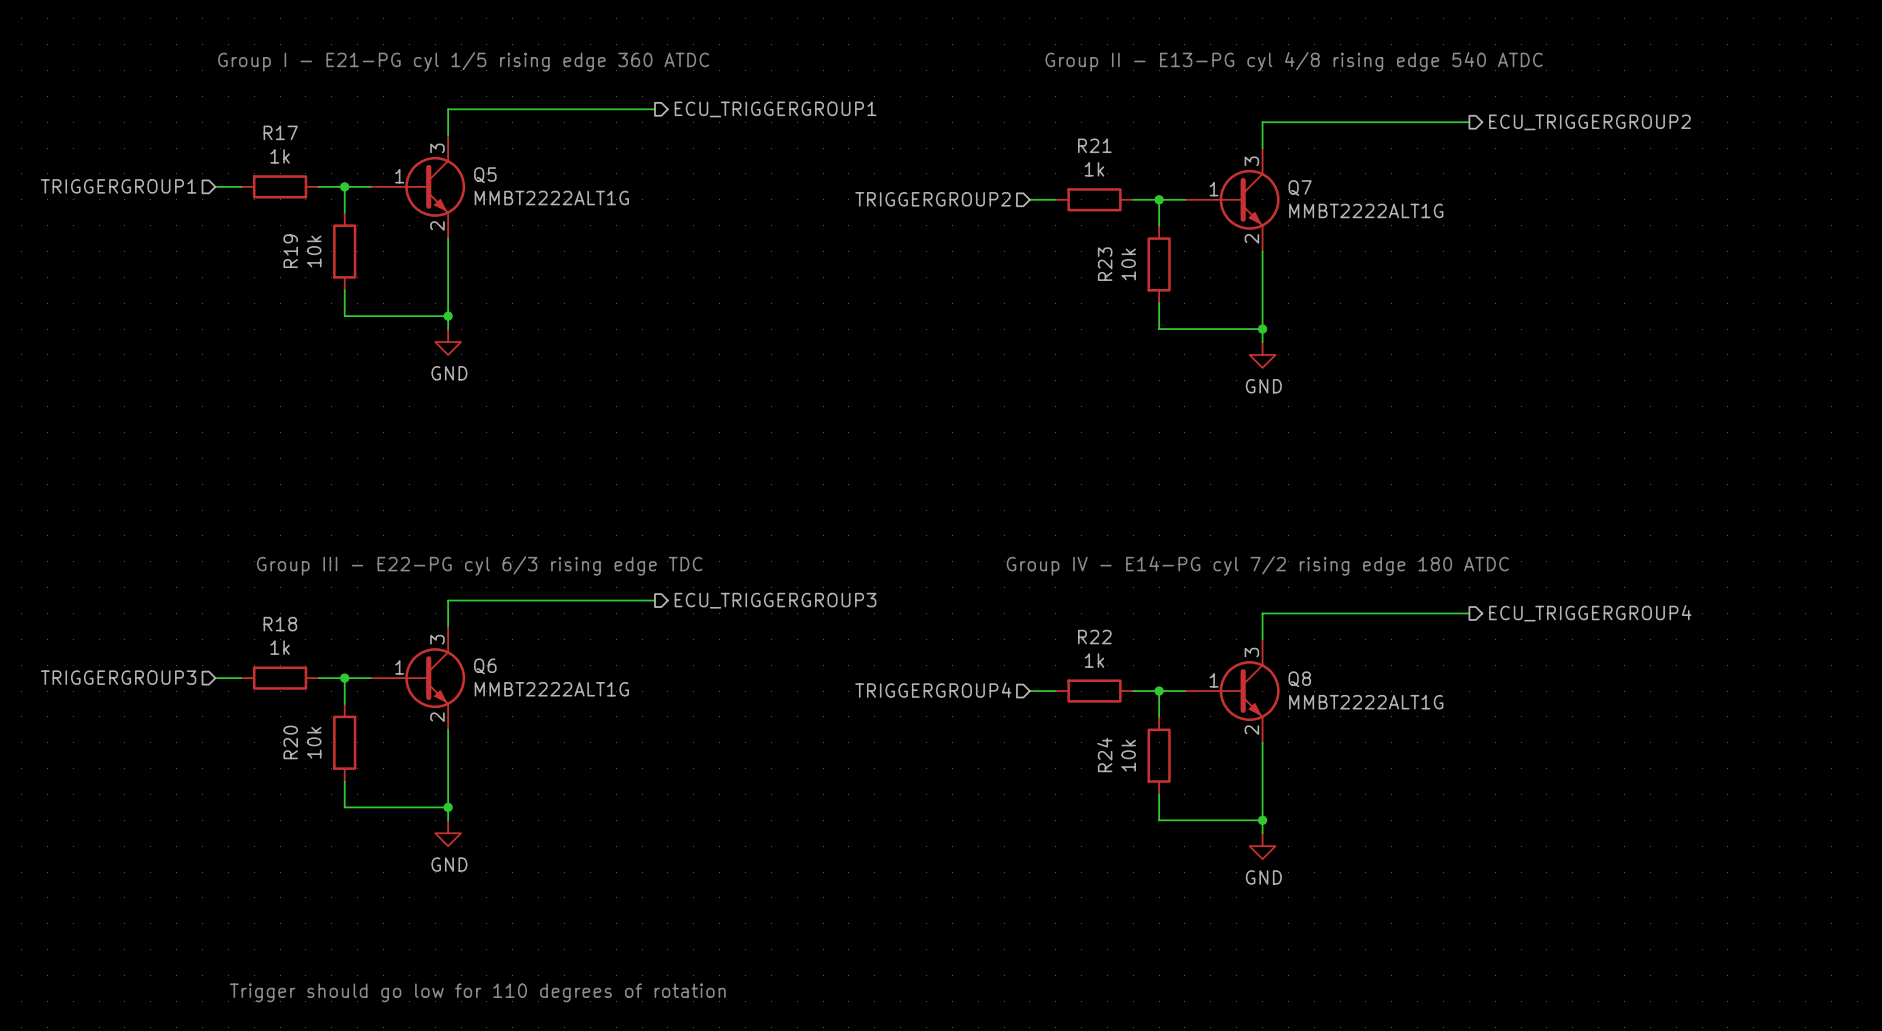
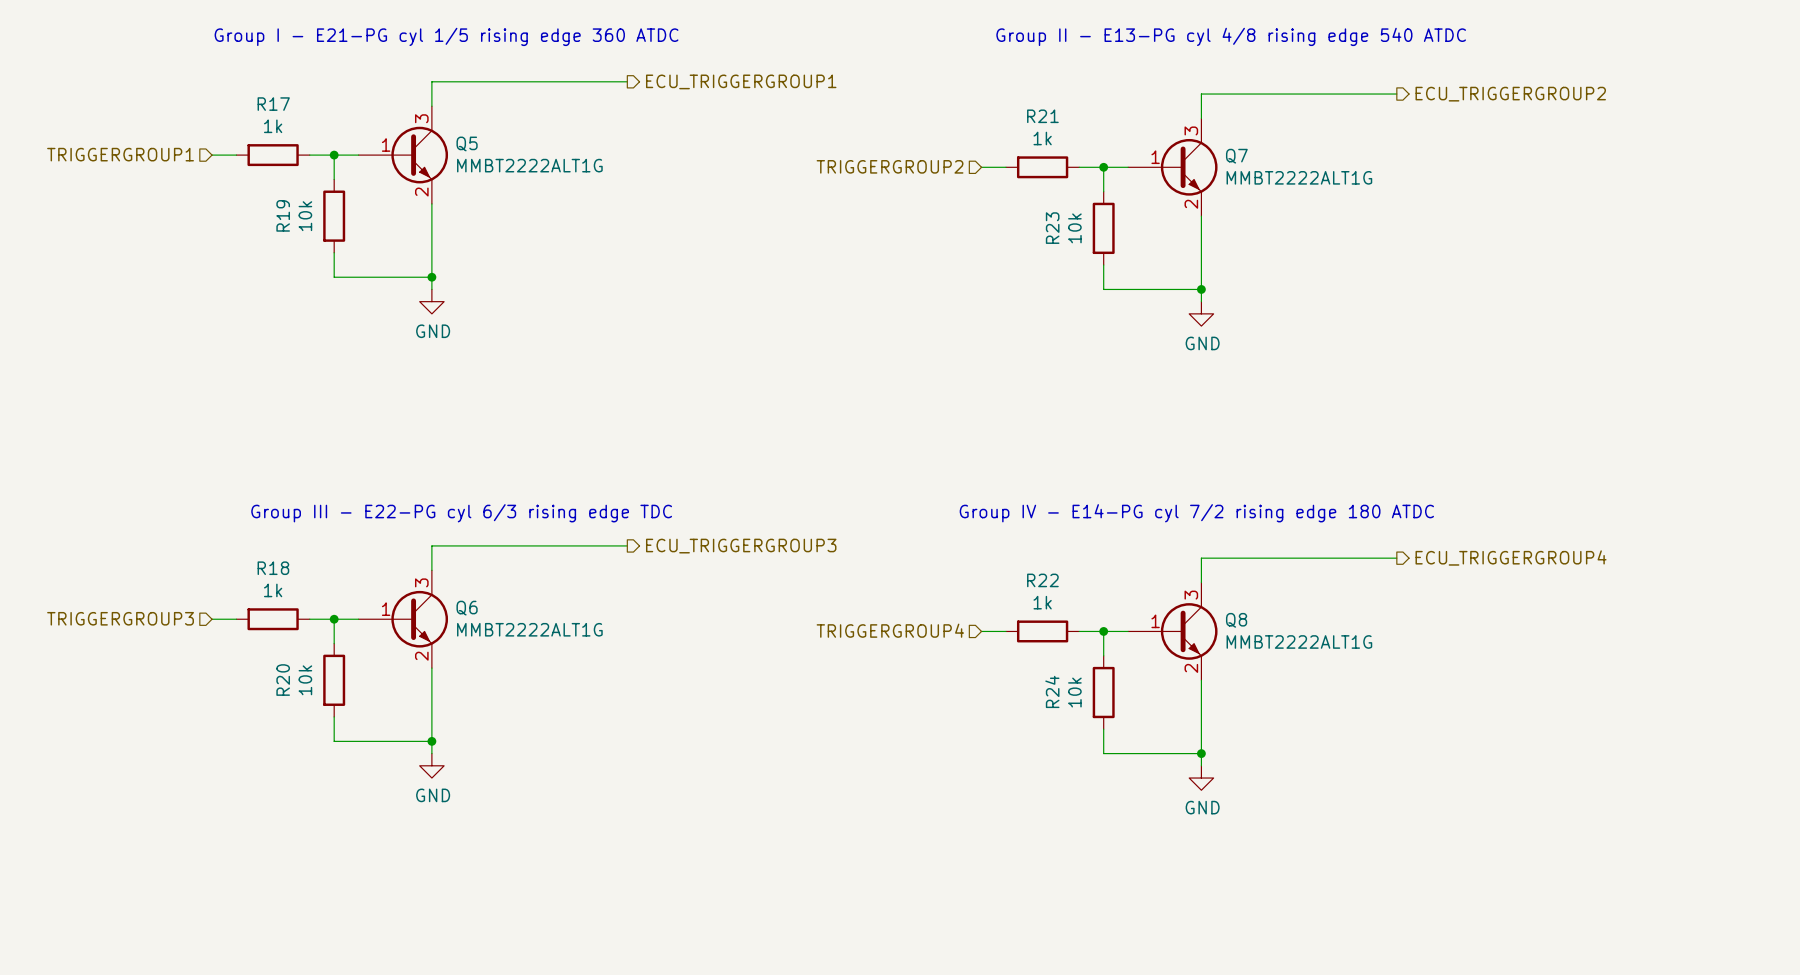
text: Trigger should go low for 110 degrees of rotation (477, 992) -> none

